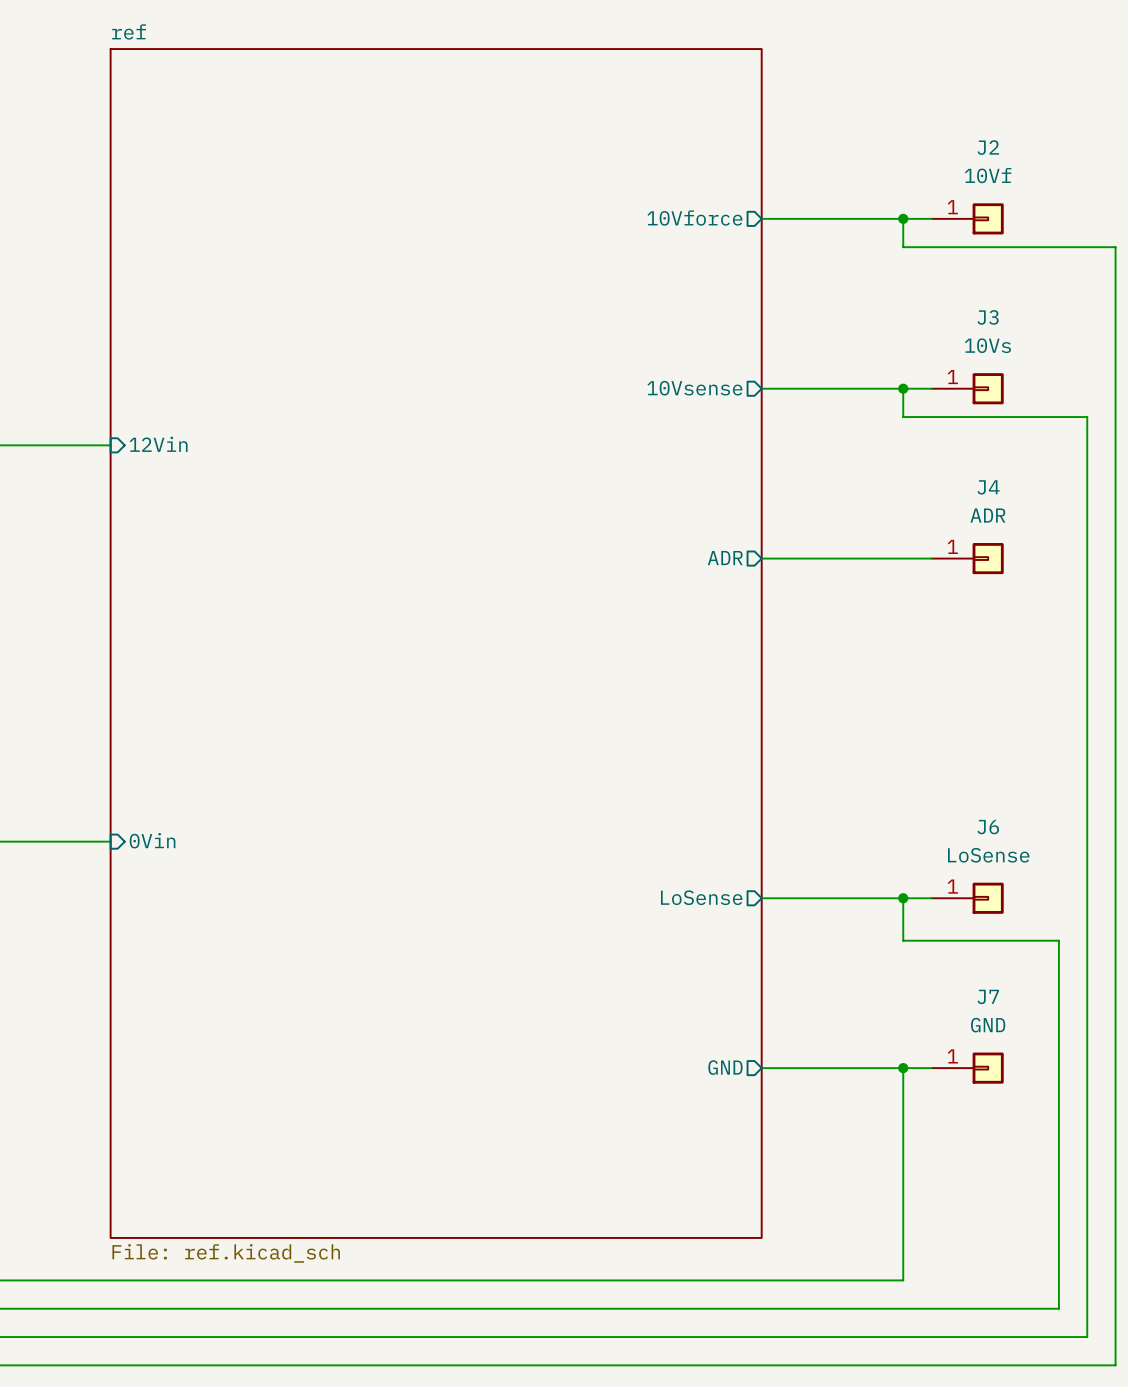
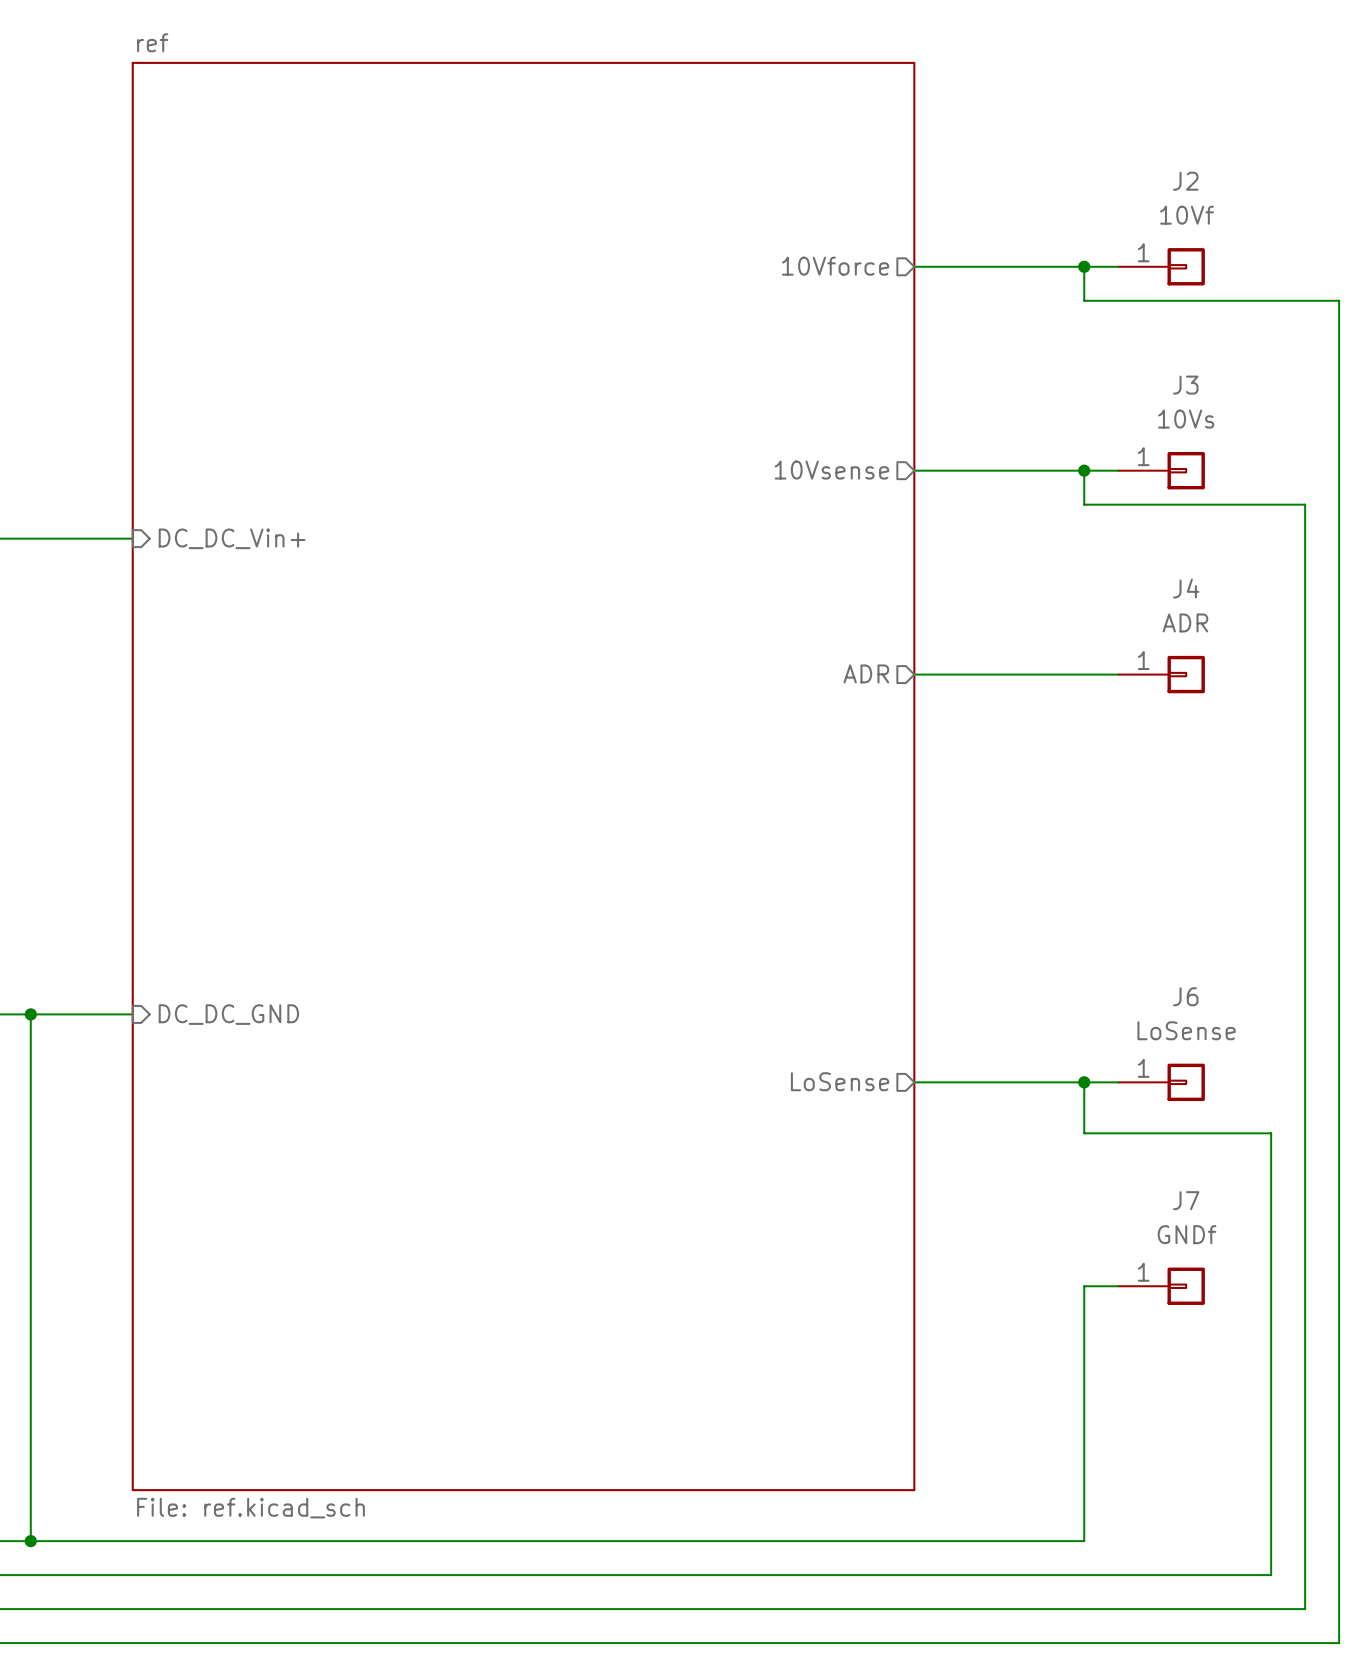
sheet pin: 12Vin (158, 444) -> DC_DC_Vin+ (232, 538)
sheet pin: 0Vin (152, 840) -> DC_DC_GND (228, 1014)
wire: none -> (30, 1014) (30, 1541)
junction: none -> (30, 1014)
J7 value: GND (988, 1025) -> GNDf (1187, 1234)
sheet pin: GND (725, 1067) -> none
wire: (761, 1068) (903, 1068) -> none
junction: (903, 1068) -> none
junction: none -> (30, 1541)

